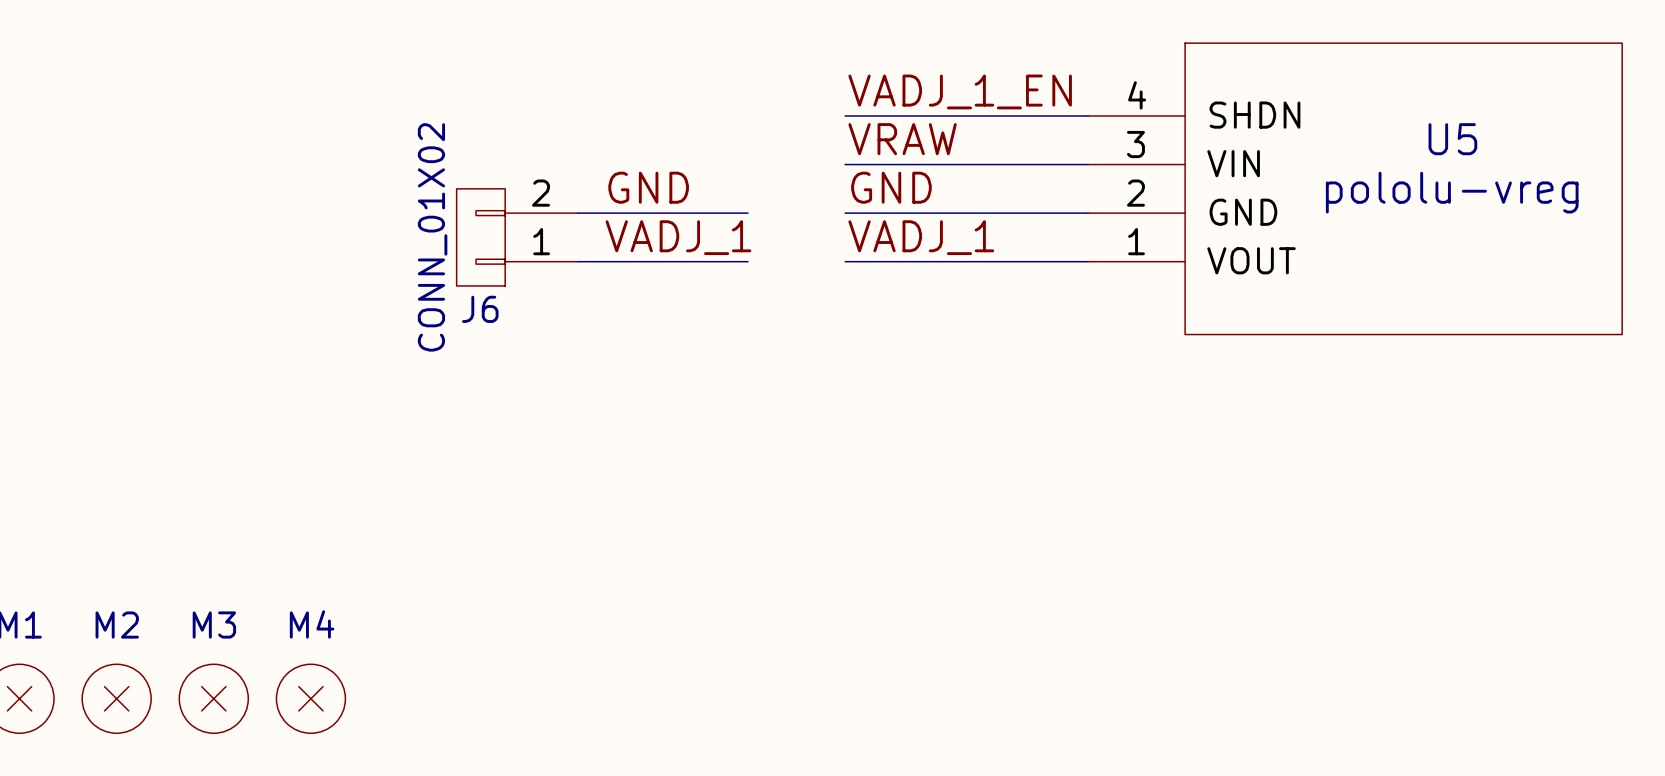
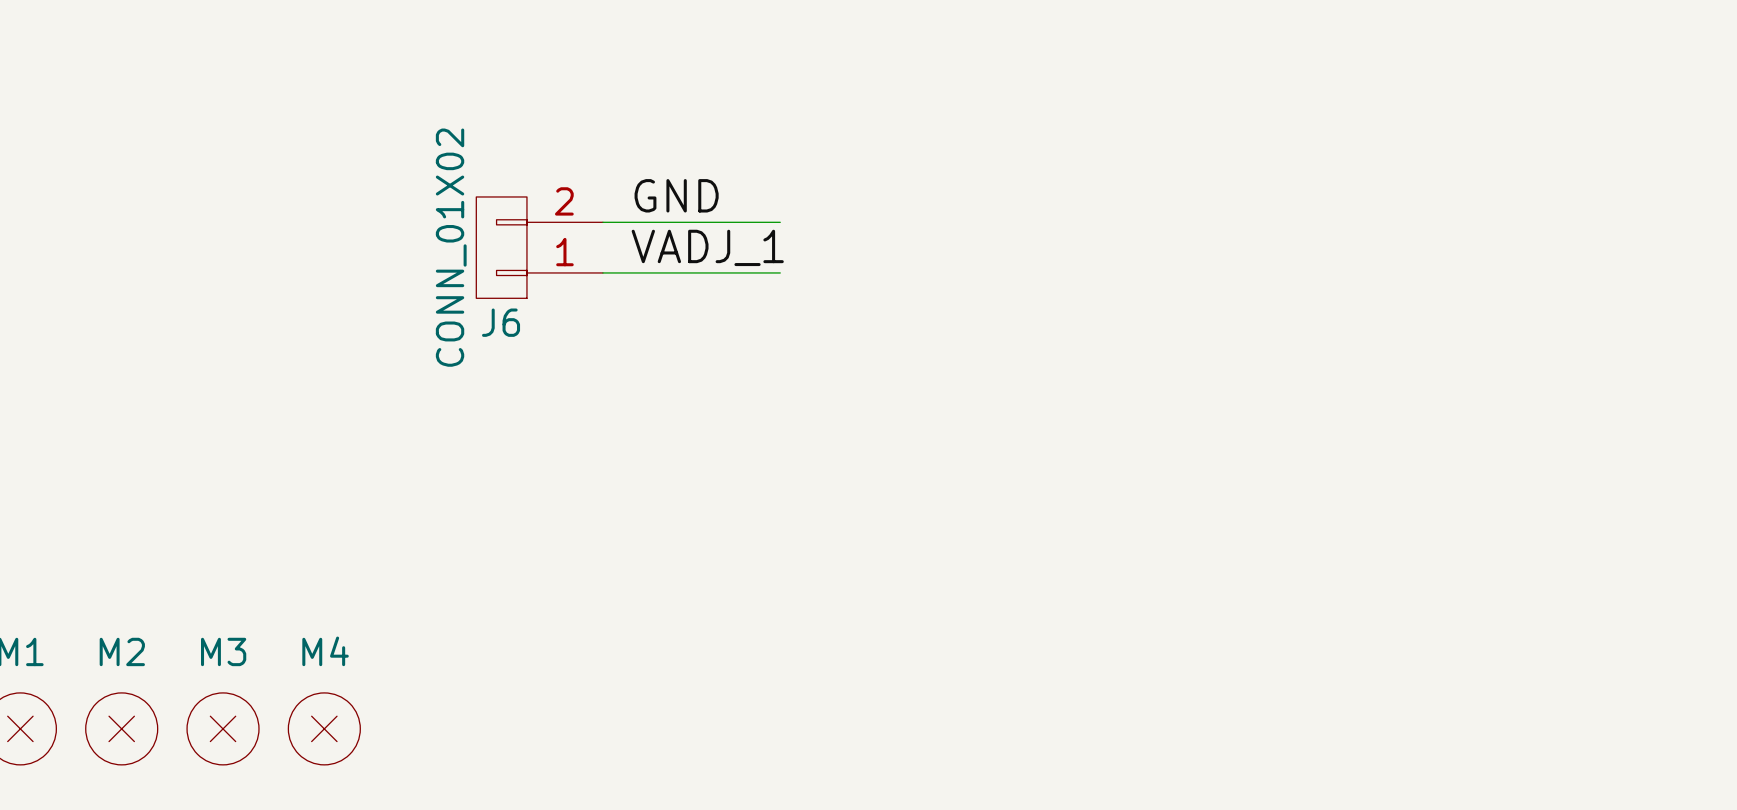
label: VADJ_1_EN (960, 91) -> none
wire: (845, 115) (1087, 115) -> none
label: VRAW (902, 139) -> none
wire: (845, 164) (1087, 164) -> none
label: GND (891, 187) -> none
U5: pololu-vreg (1355, 188) -> none
wire: (845, 213) (1087, 213) -> none
label: VADJ_1 (921, 237) -> none
wire: (845, 261) (1087, 261) -> none

